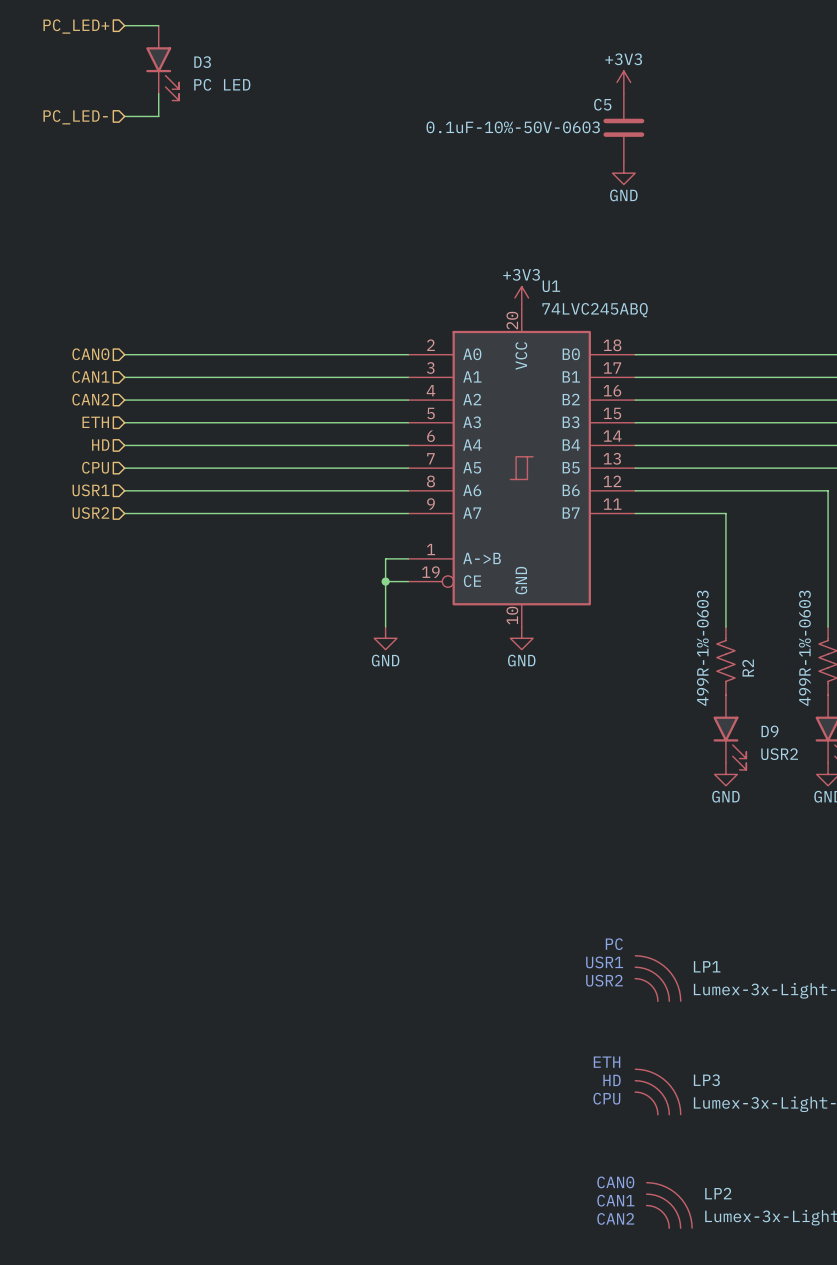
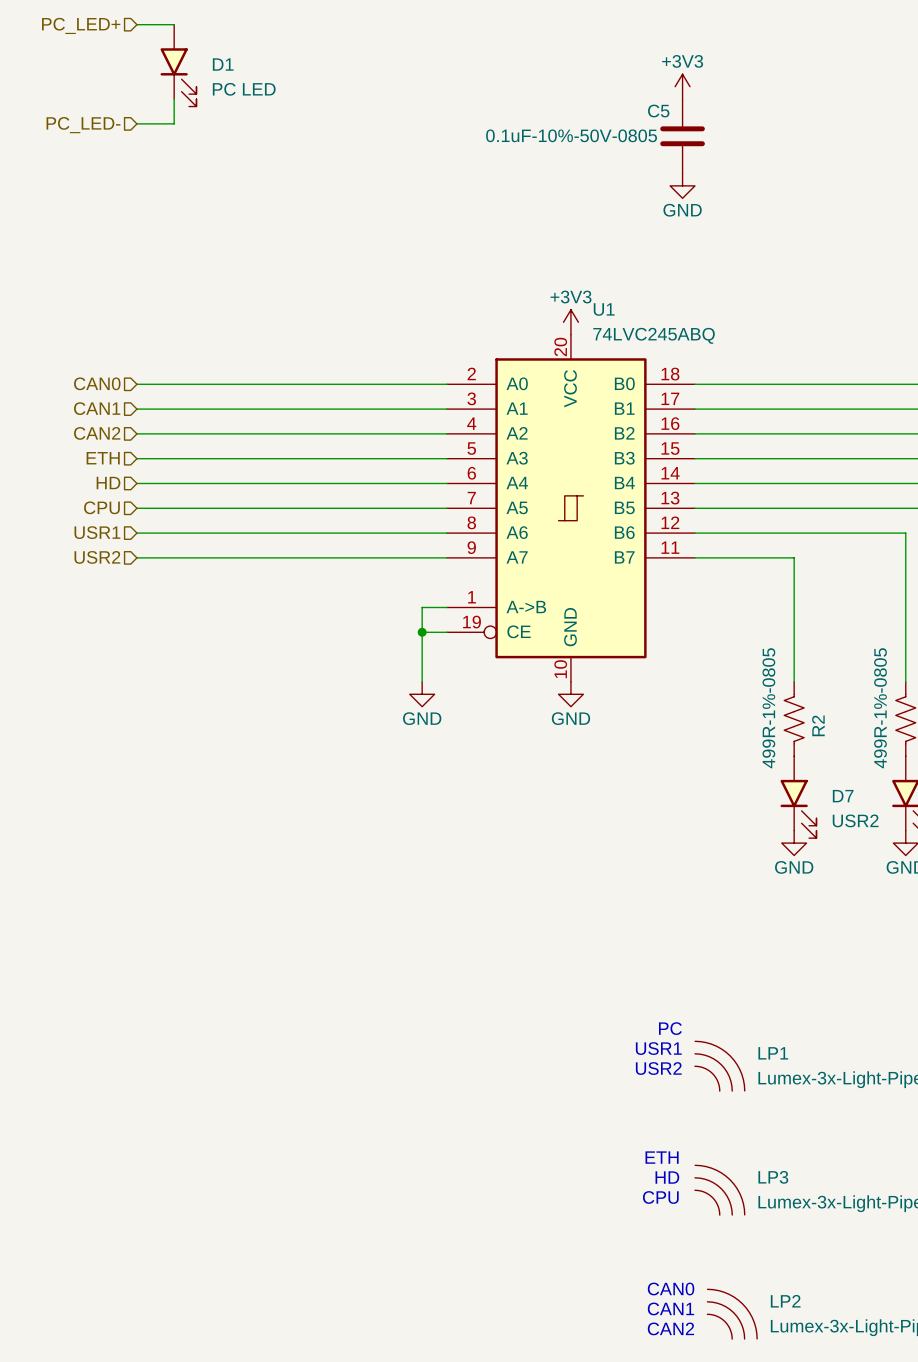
D3 name: D3 (202, 62) -> D1 (223, 64)
C5 value: 0.1uF-10%-50V-0603 (513, 127) -> 0.1uF-10%-50V-0805 (571, 135)
R2 value: 499R-1%-0603 (702, 648) -> 499R-1%-0805 (768, 708)
part value: 499R-1%-0603 (804, 648) -> 499R-1%-0805 (880, 708)
D9 name: D9 (769, 731) -> D7 (843, 796)

